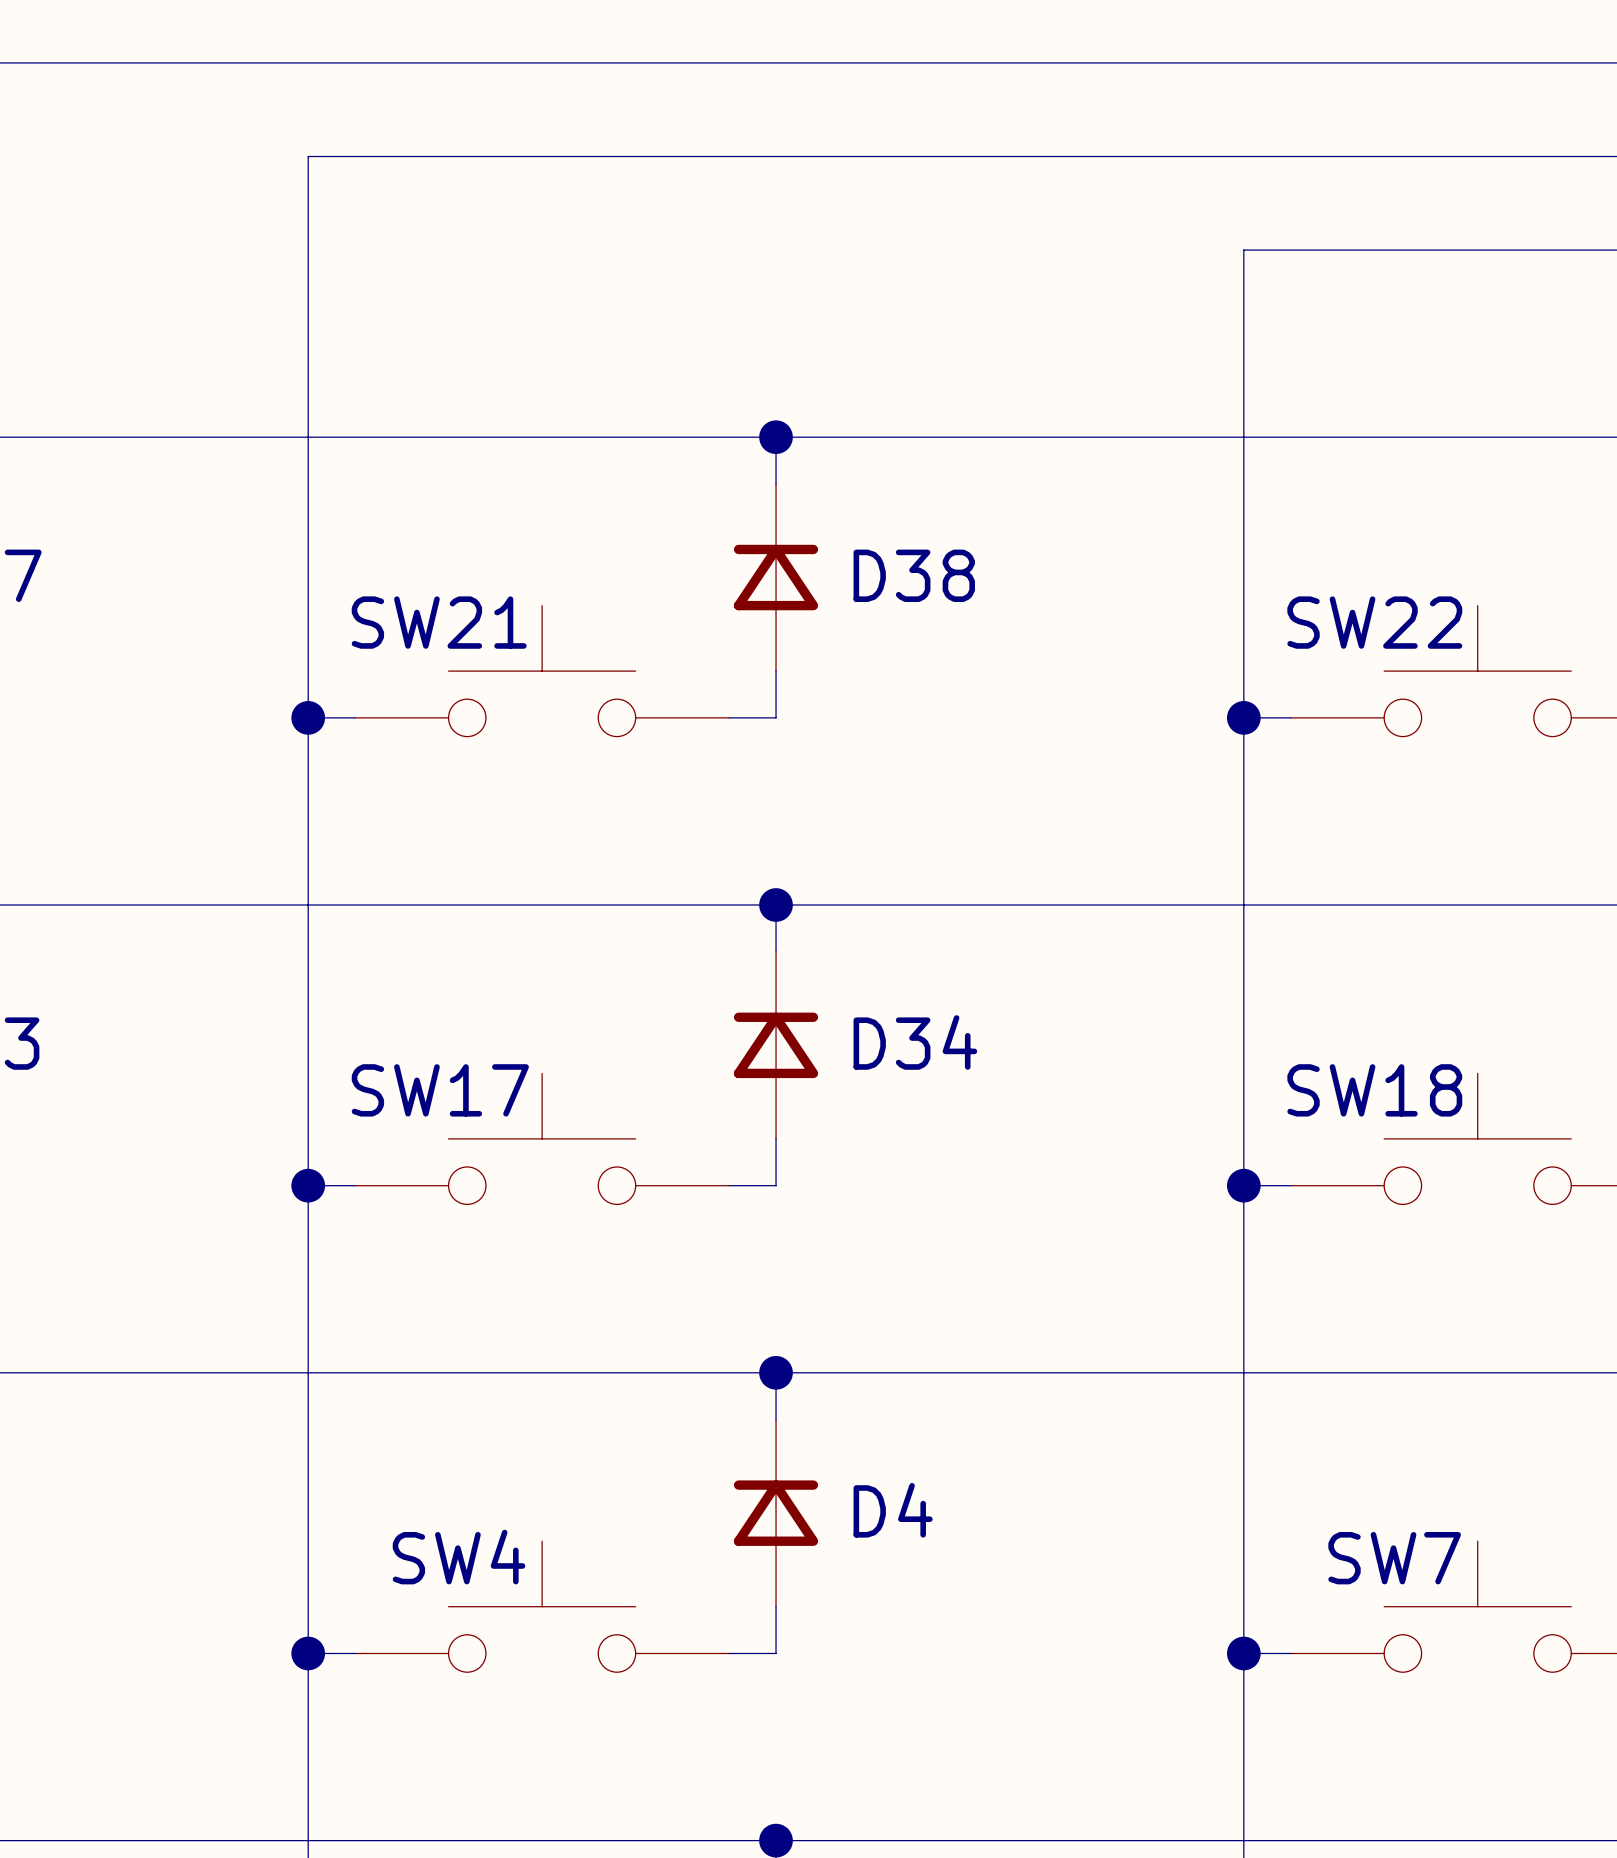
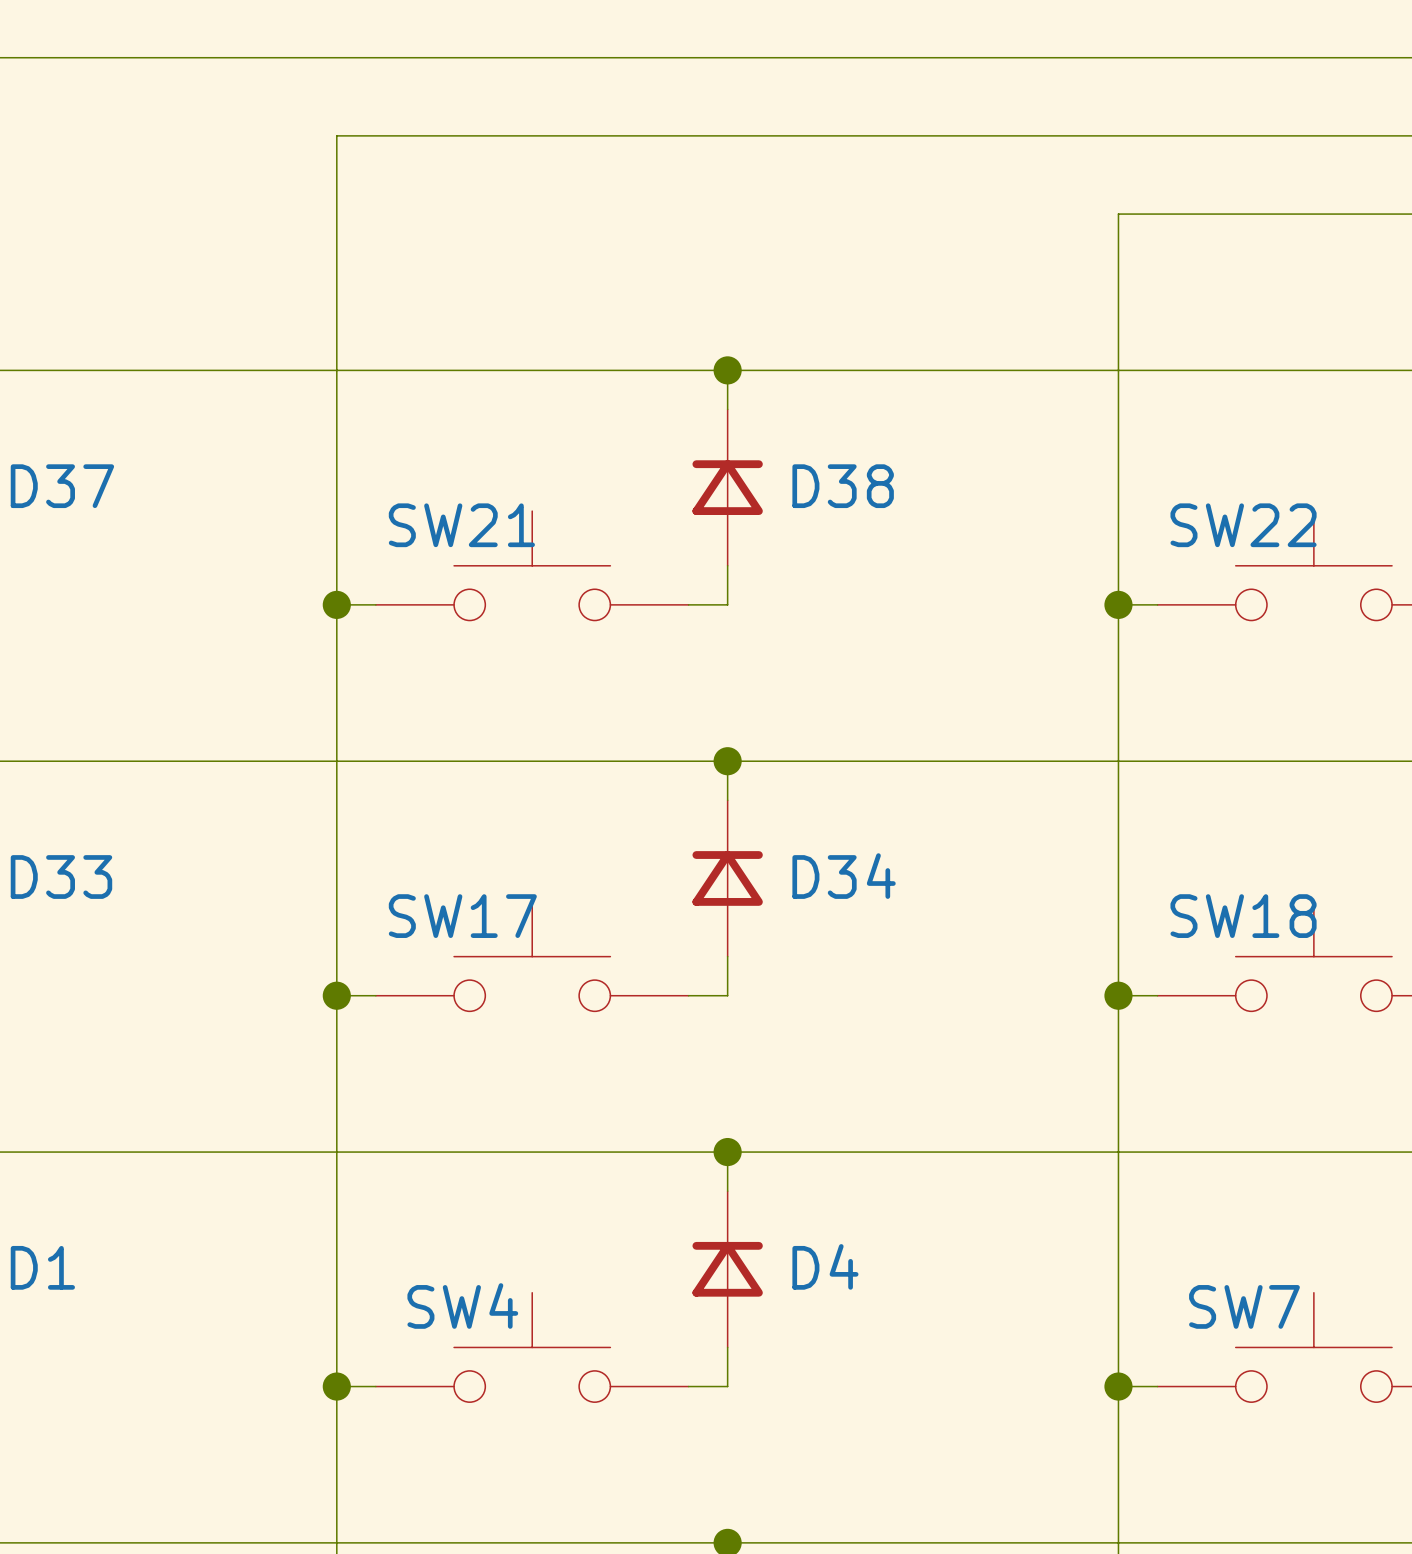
SW21 name position: SW21 (439, 622) -> SW21 (461, 525)
SW22 name position: SW22 (1374, 622) -> SW22 (1243, 525)
SW17 name position: SW17 (440, 1090) -> SW17 (462, 916)
SW18 name position: SW18 (1374, 1090) -> SW18 (1243, 916)

